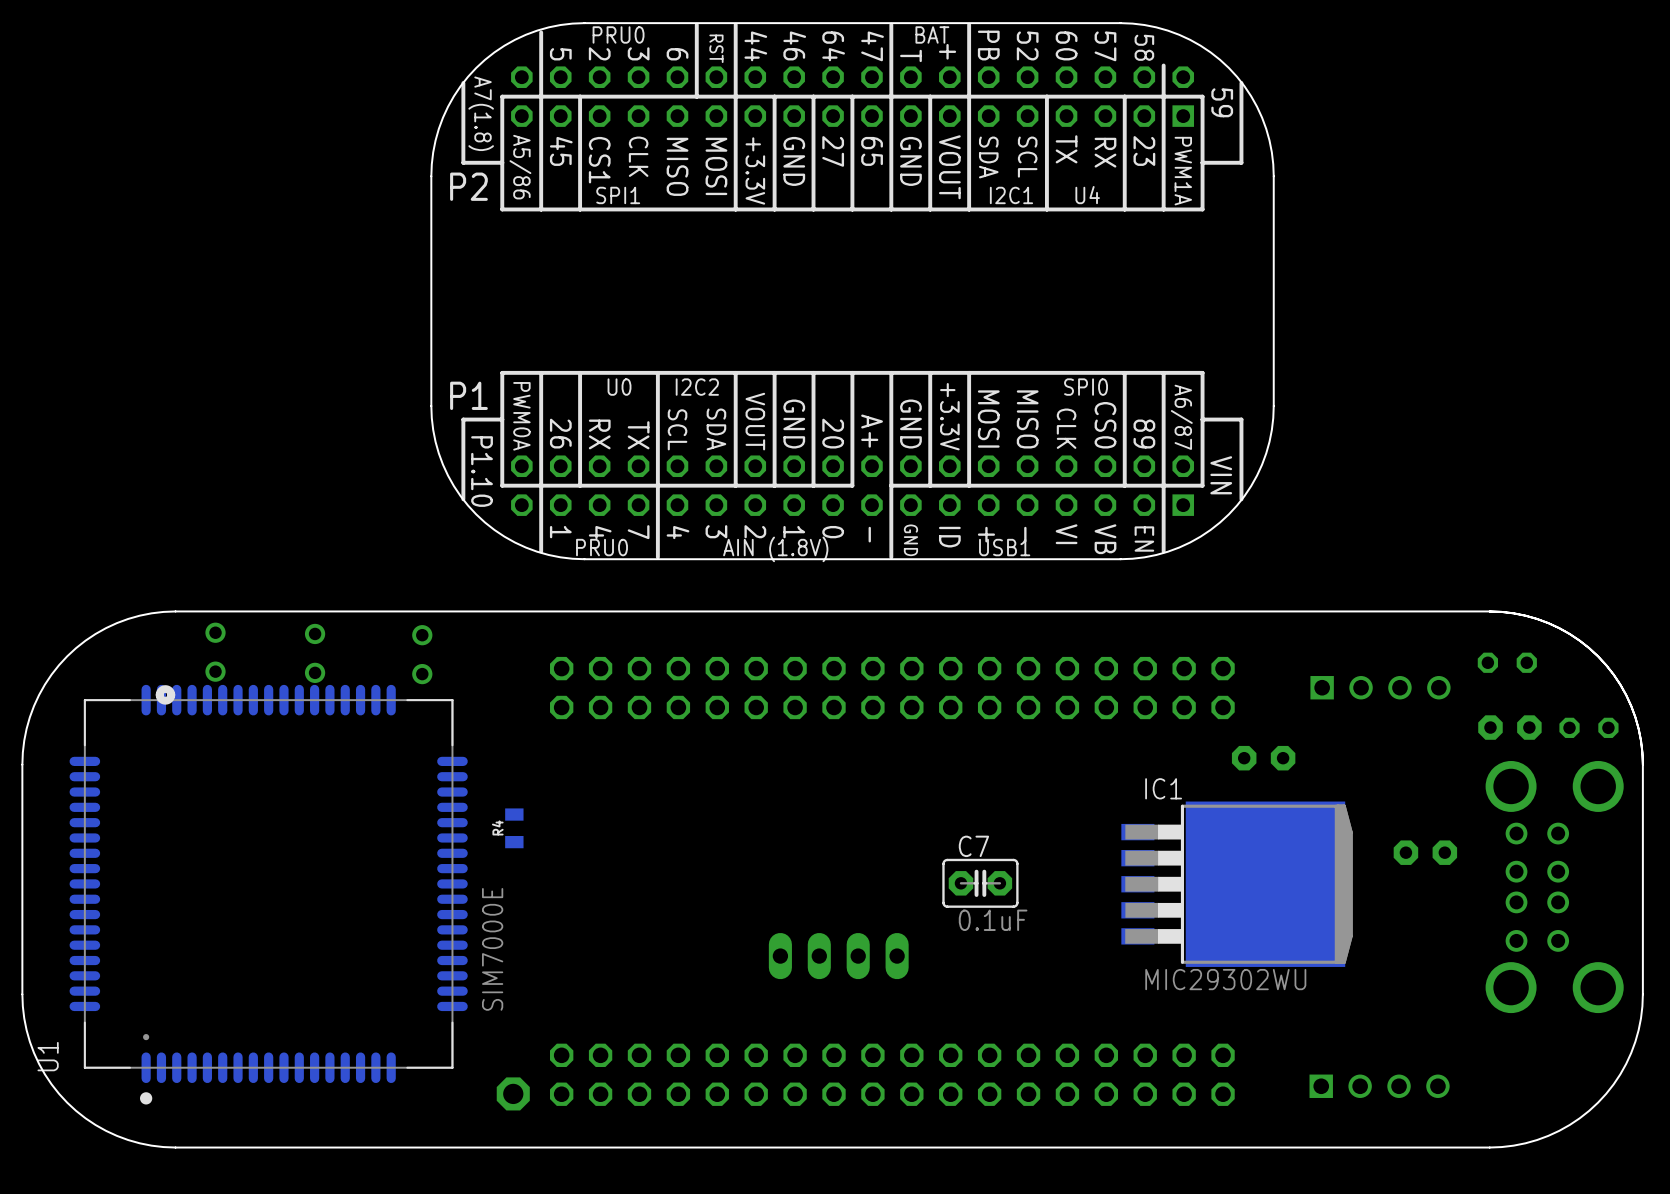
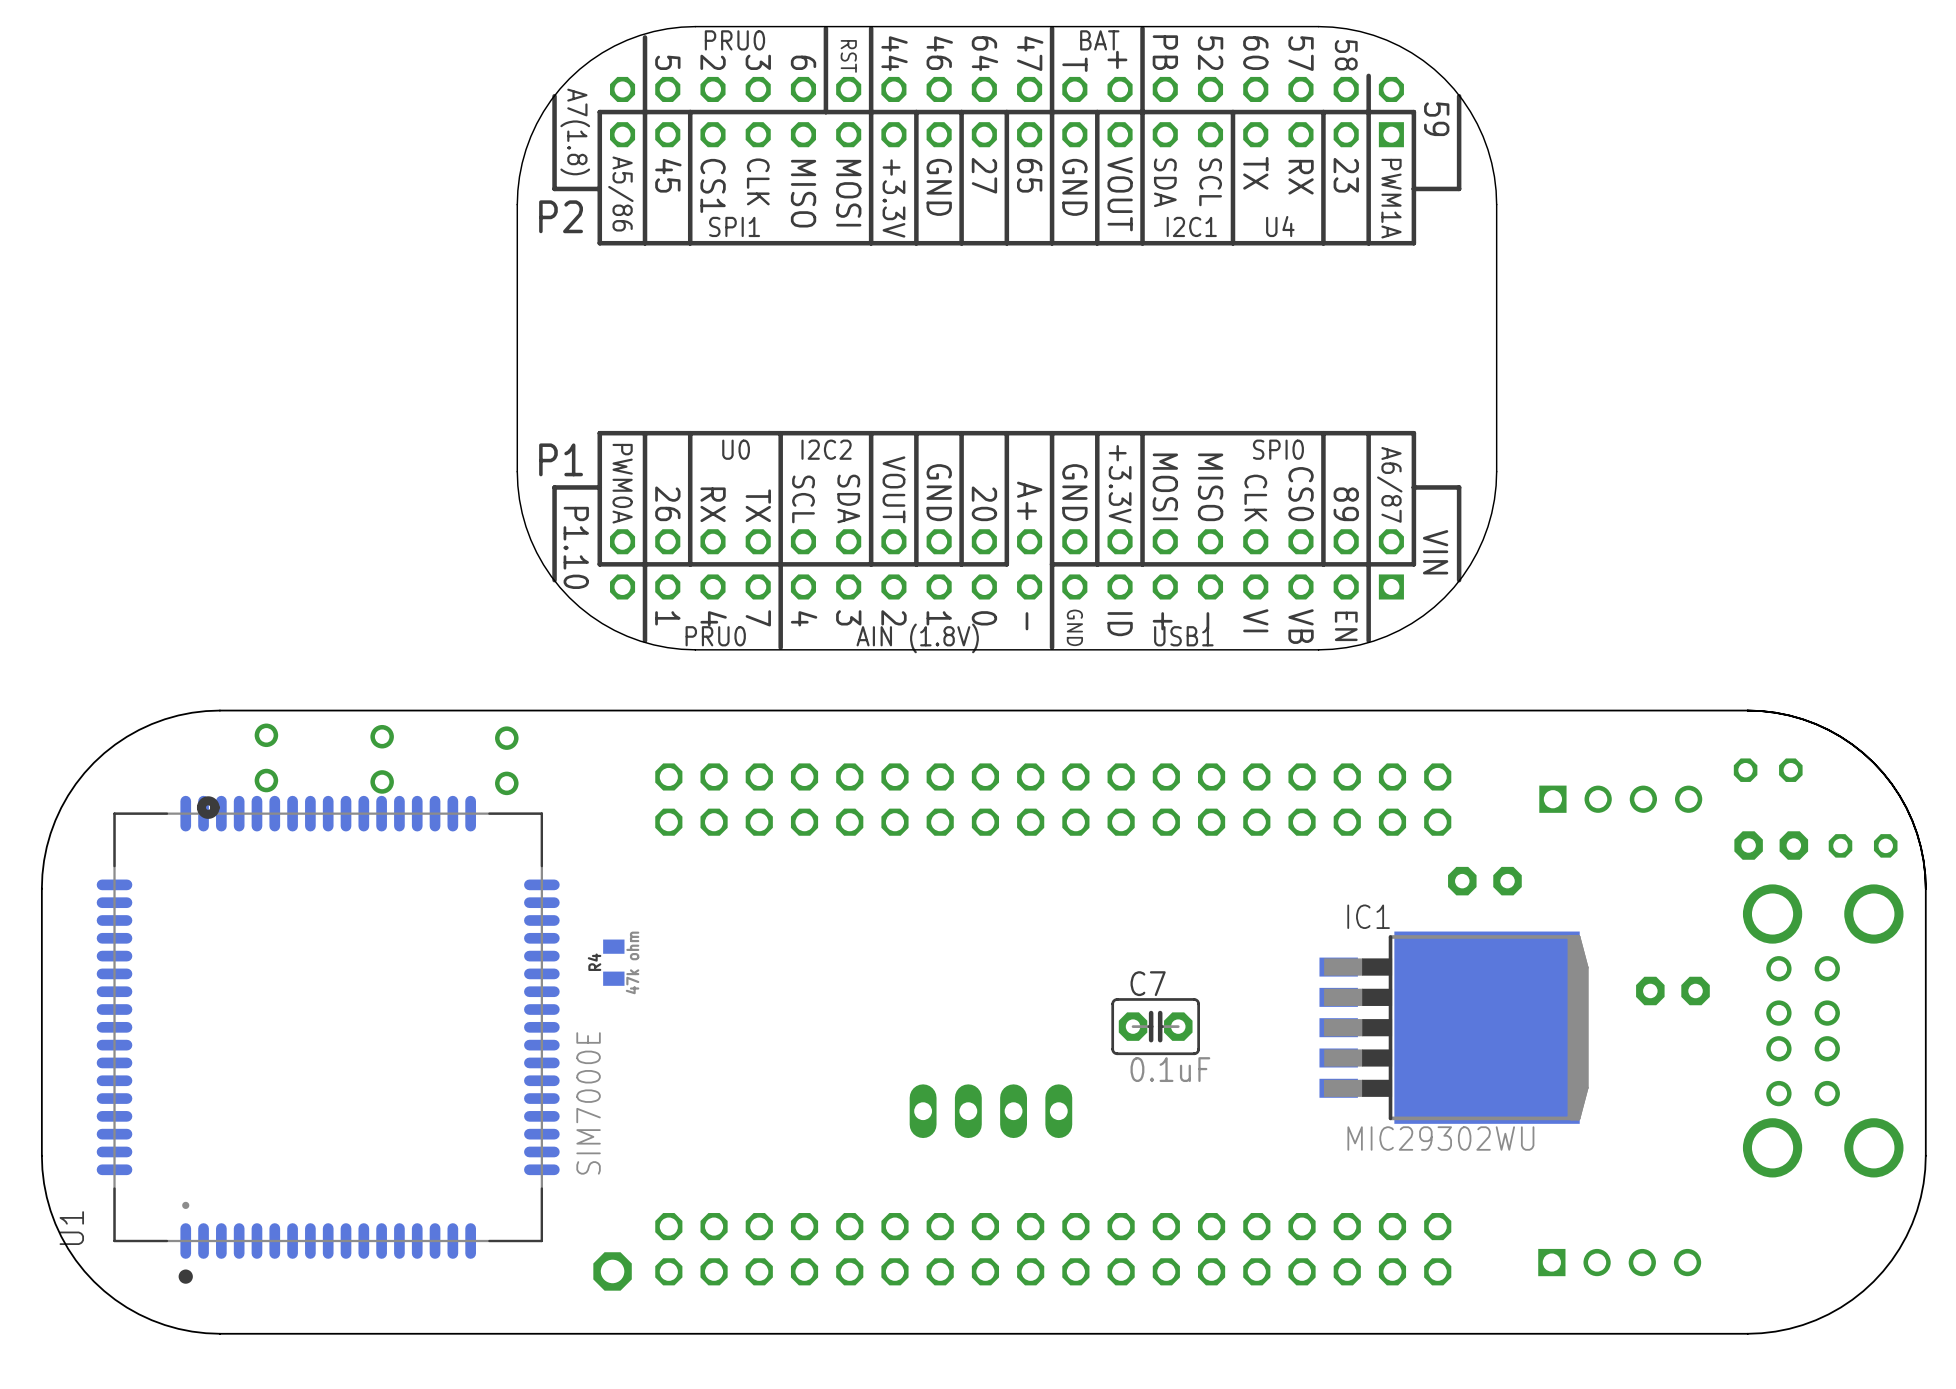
R4 value: none -> 47k ohm (632, 962)

